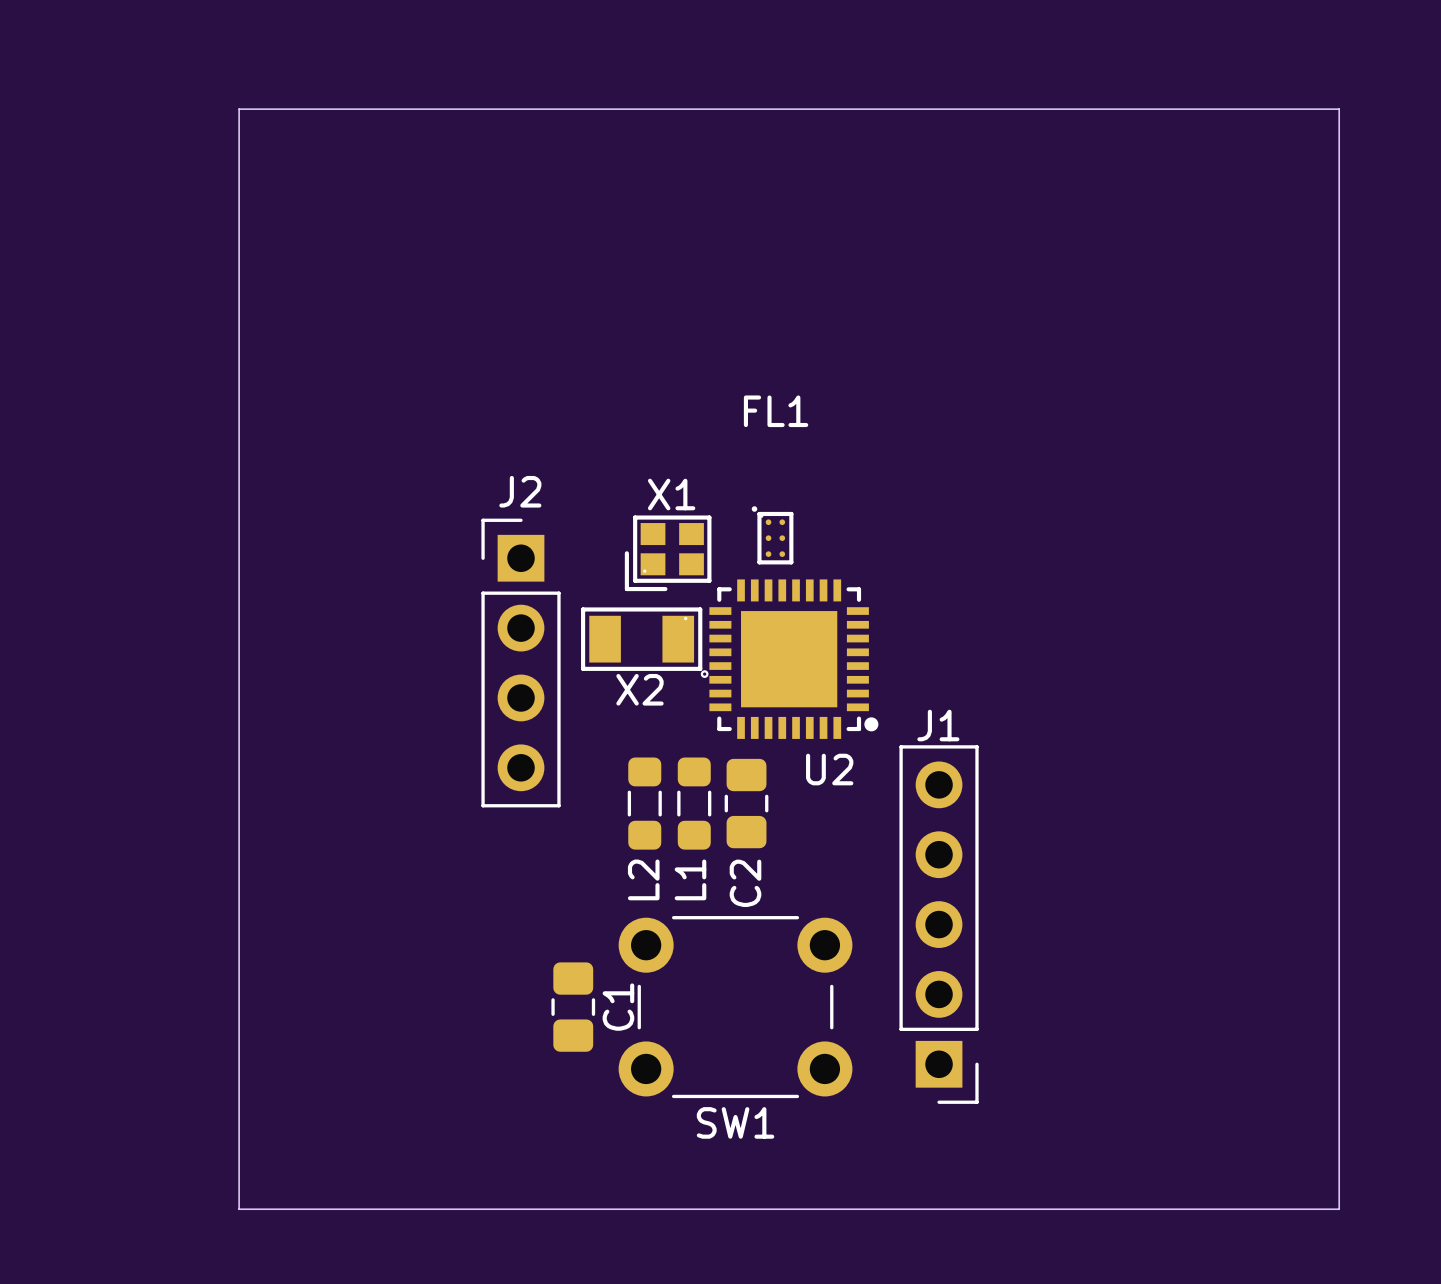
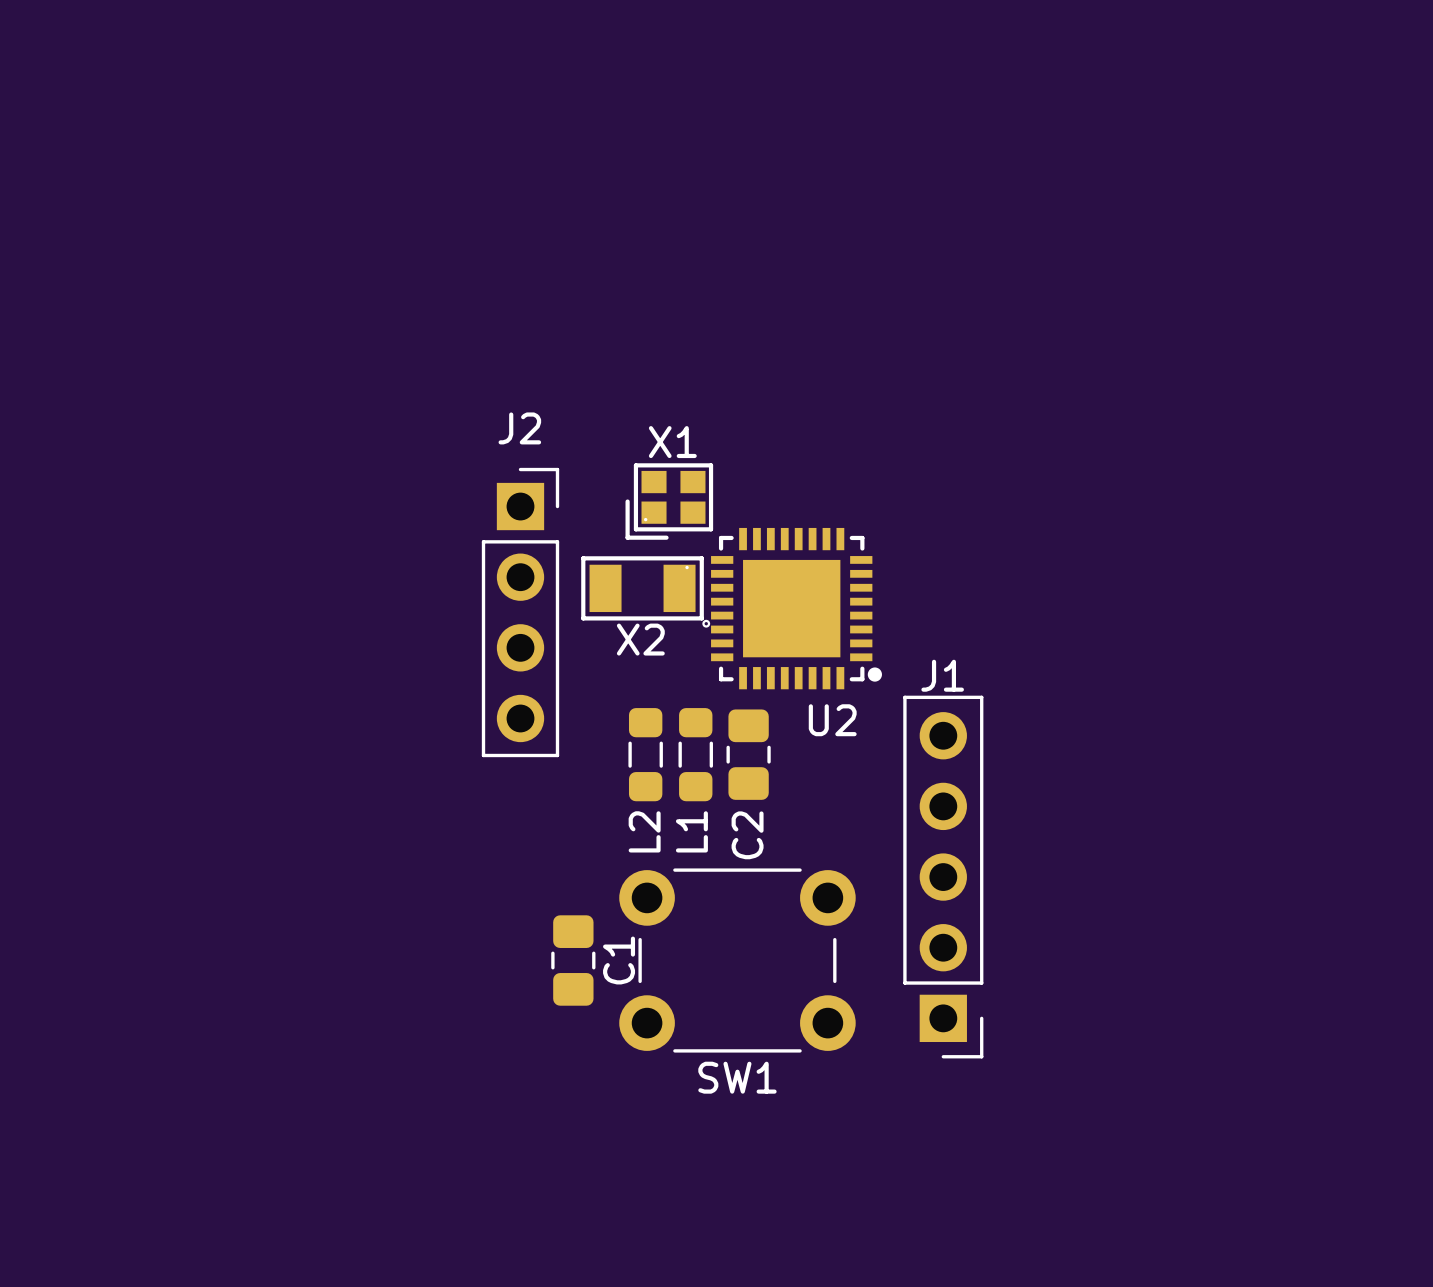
board edge: (239, 109) (1339, 109) (1339, 1209) (239, 1209) (239, 109) -> none
J2 footprint: [481, 518, 561, 808] -> [481, 467, 560, 758]
FL1: (772, 535) -> none

